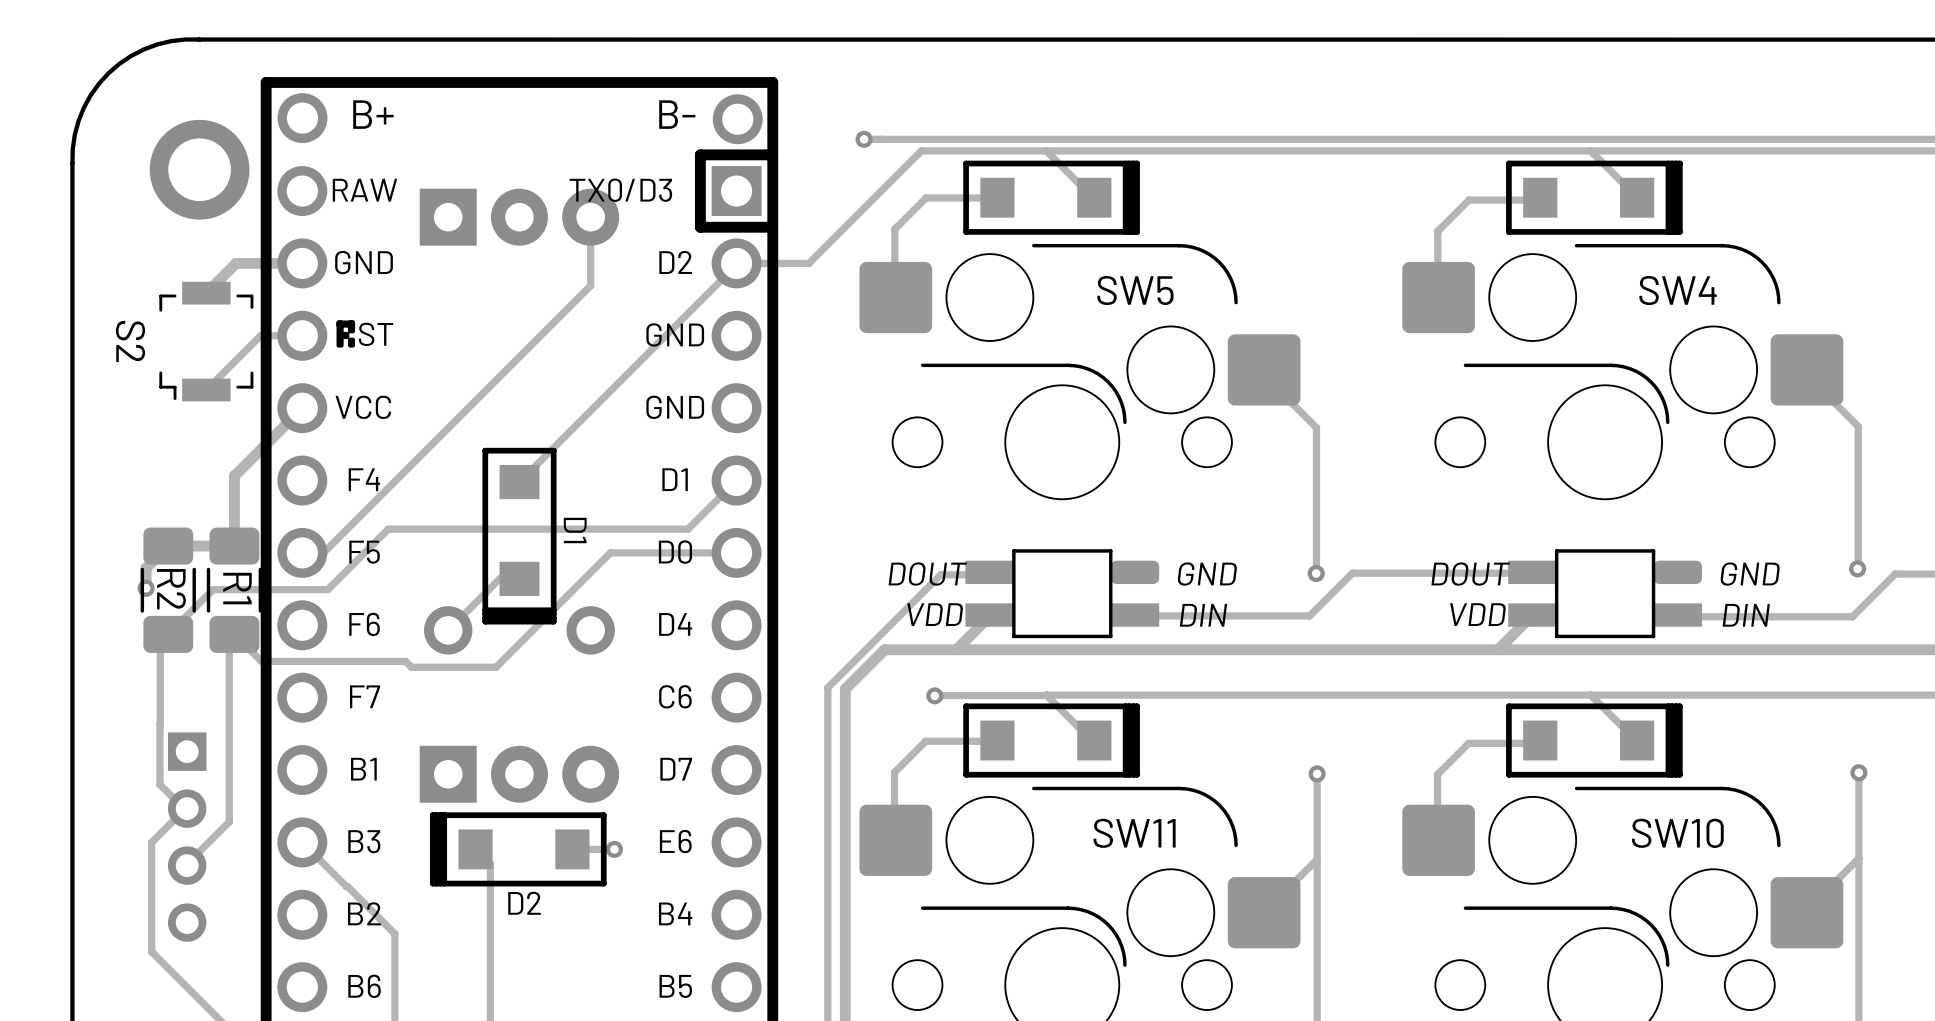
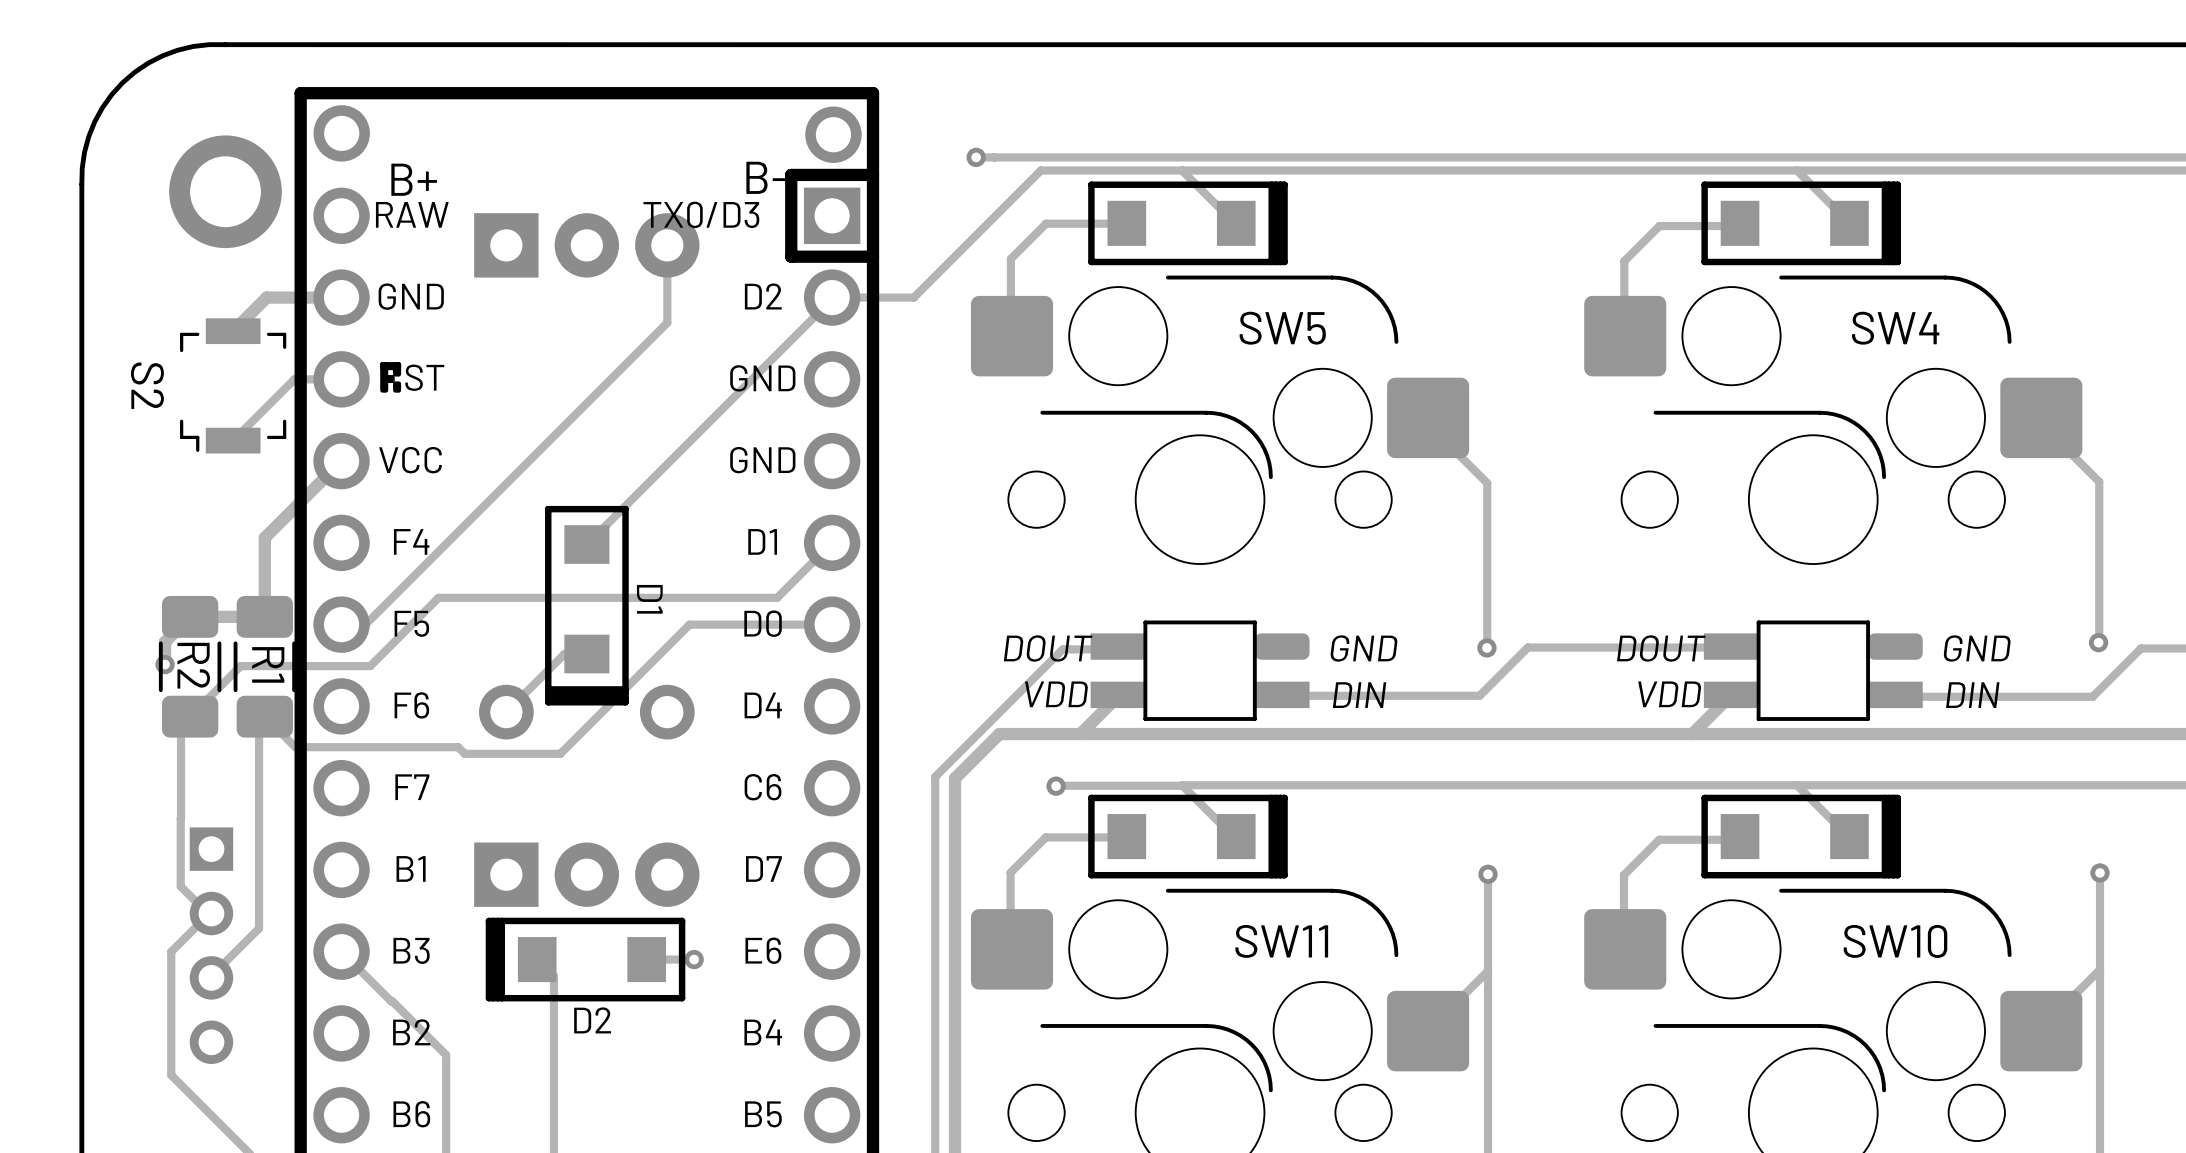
text position: B+ (373, 114) -> B+ (414, 179)
text position: B- (677, 114) -> B- (766, 177)

